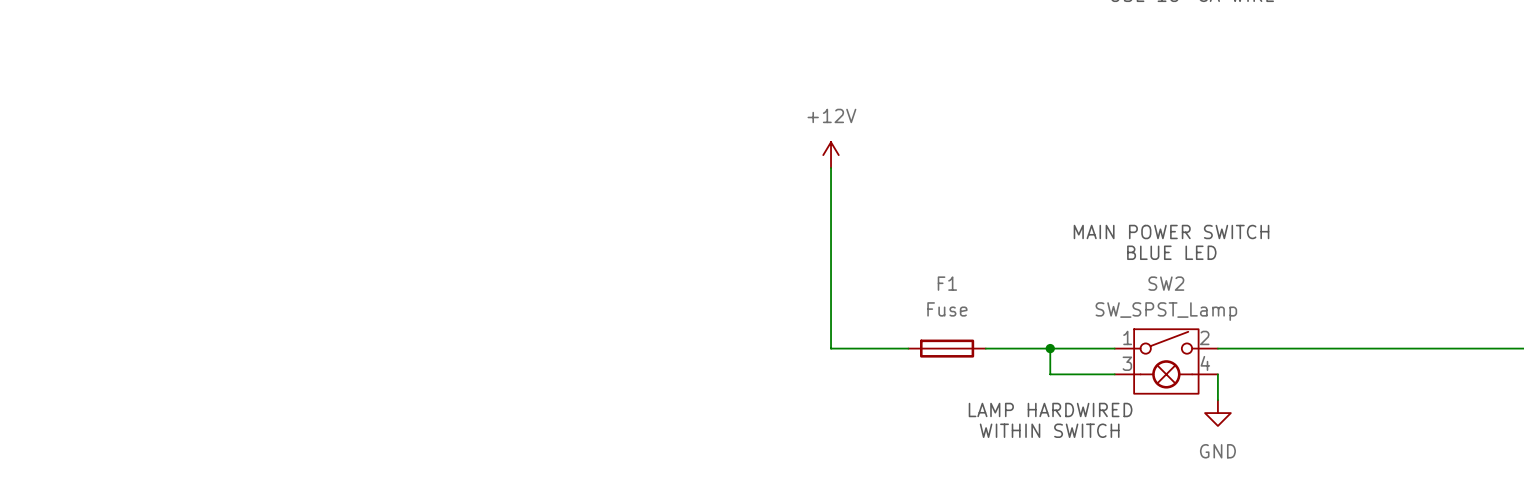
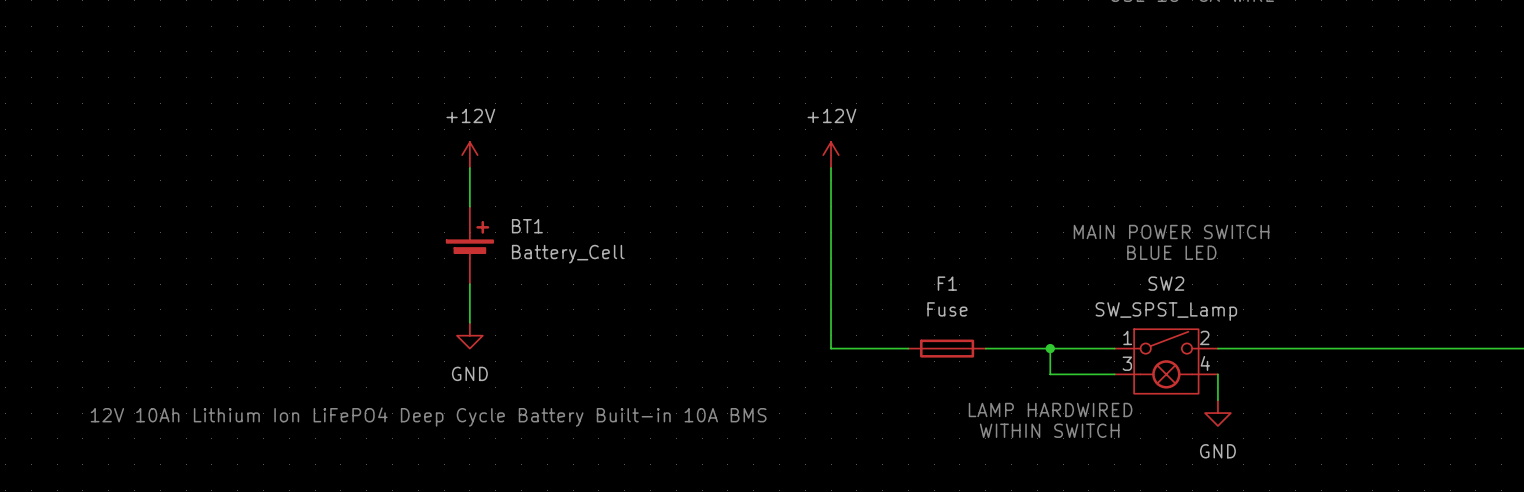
power symbol: none -> +12V (469, 155)
wire: none -> (469, 168) (469, 206)
BT1: none -> Battery_Cell (469, 245)
wire: none -> (469, 284) (469, 322)
power symbol: none -> GND (469, 335)
text: none -> 12V 10Ah Lithium Ion LiFePO4 Deep Cycle Battery Built-in 10A BMS (428, 417)

